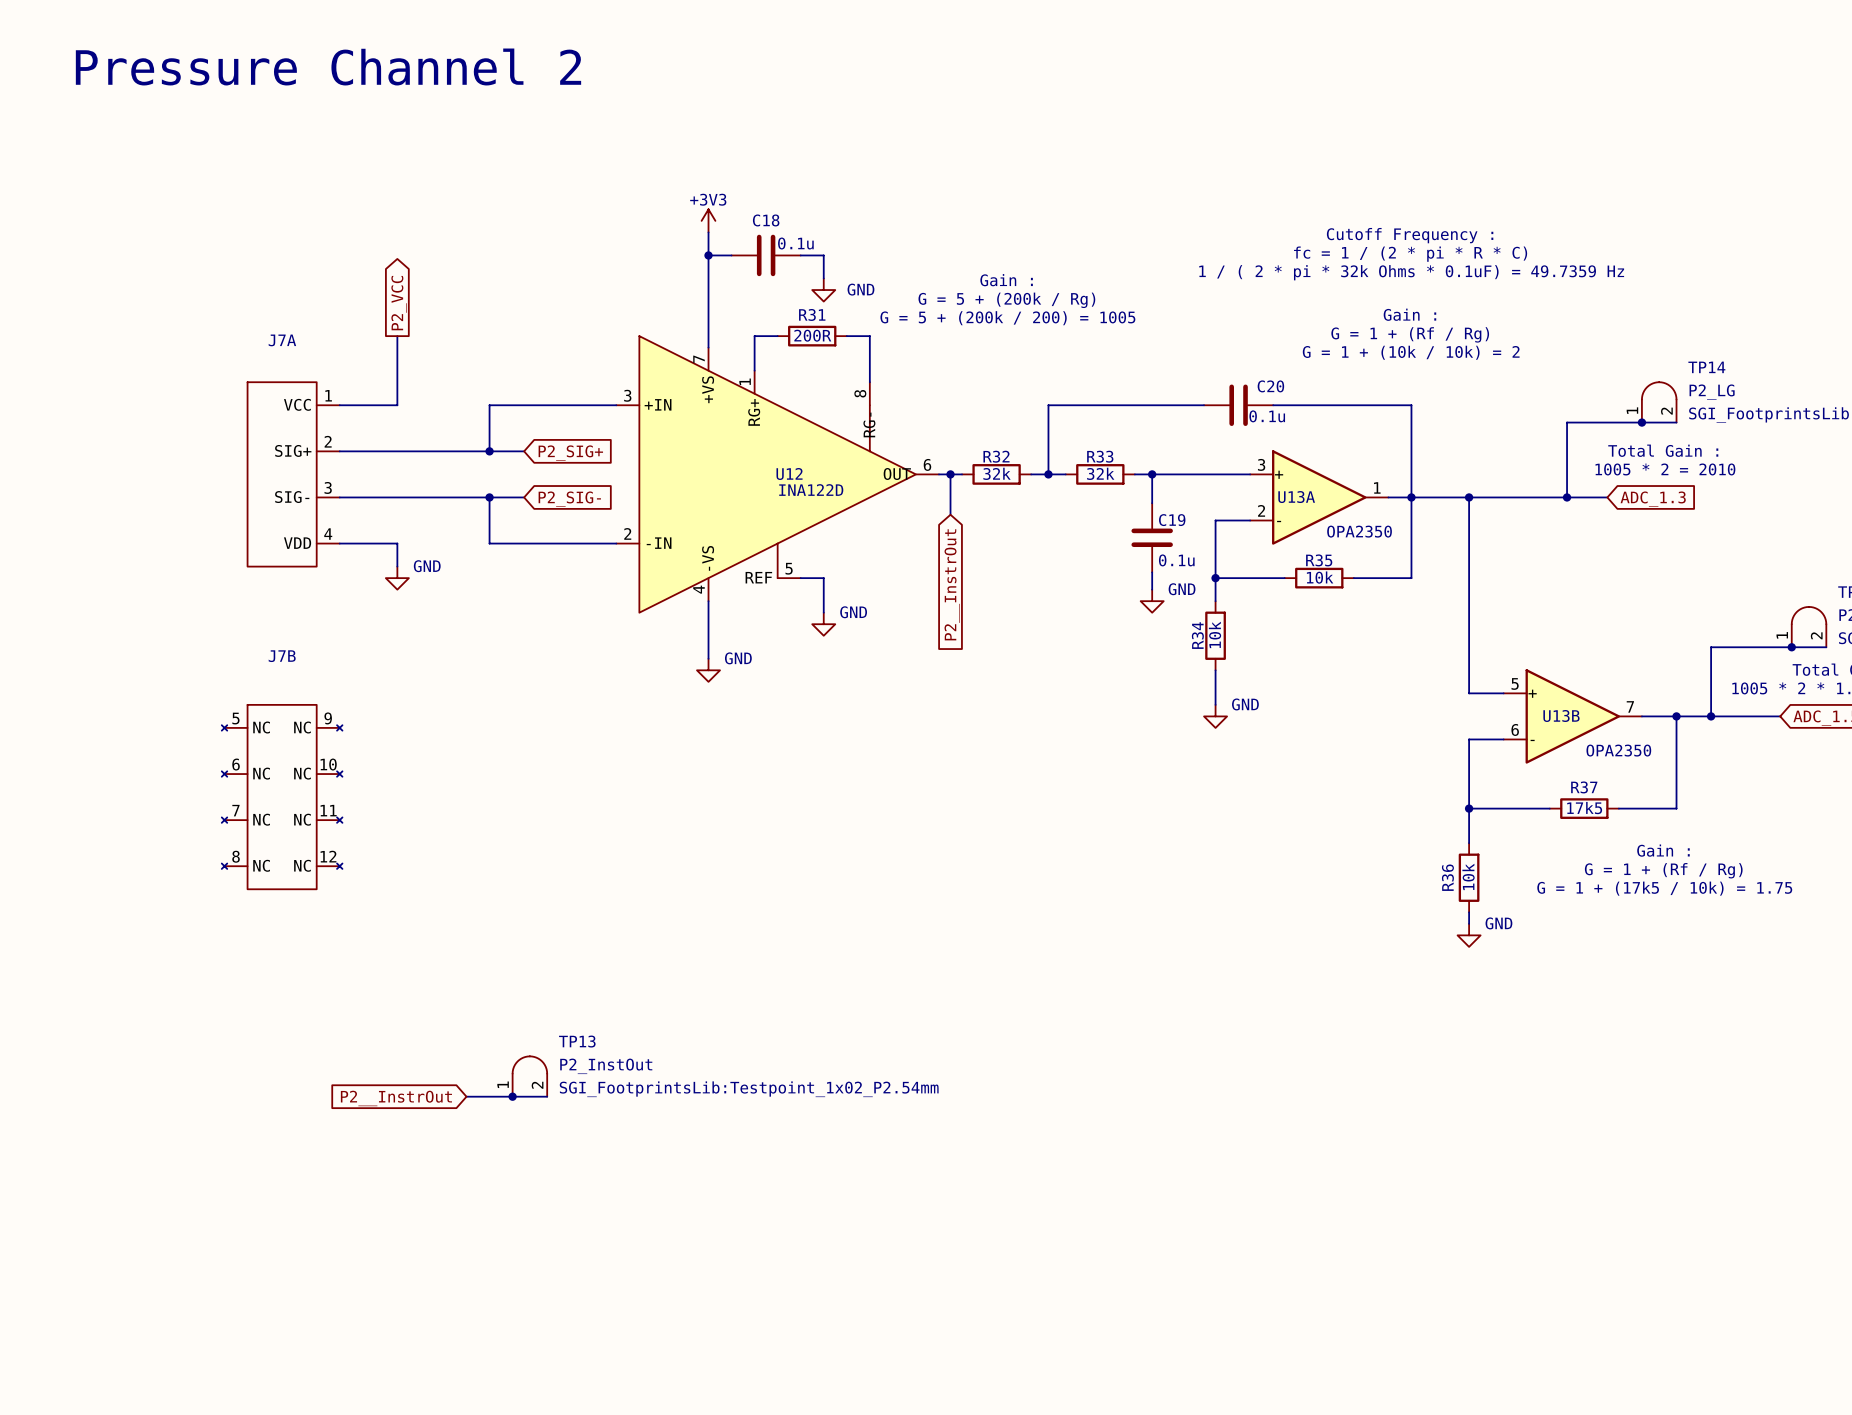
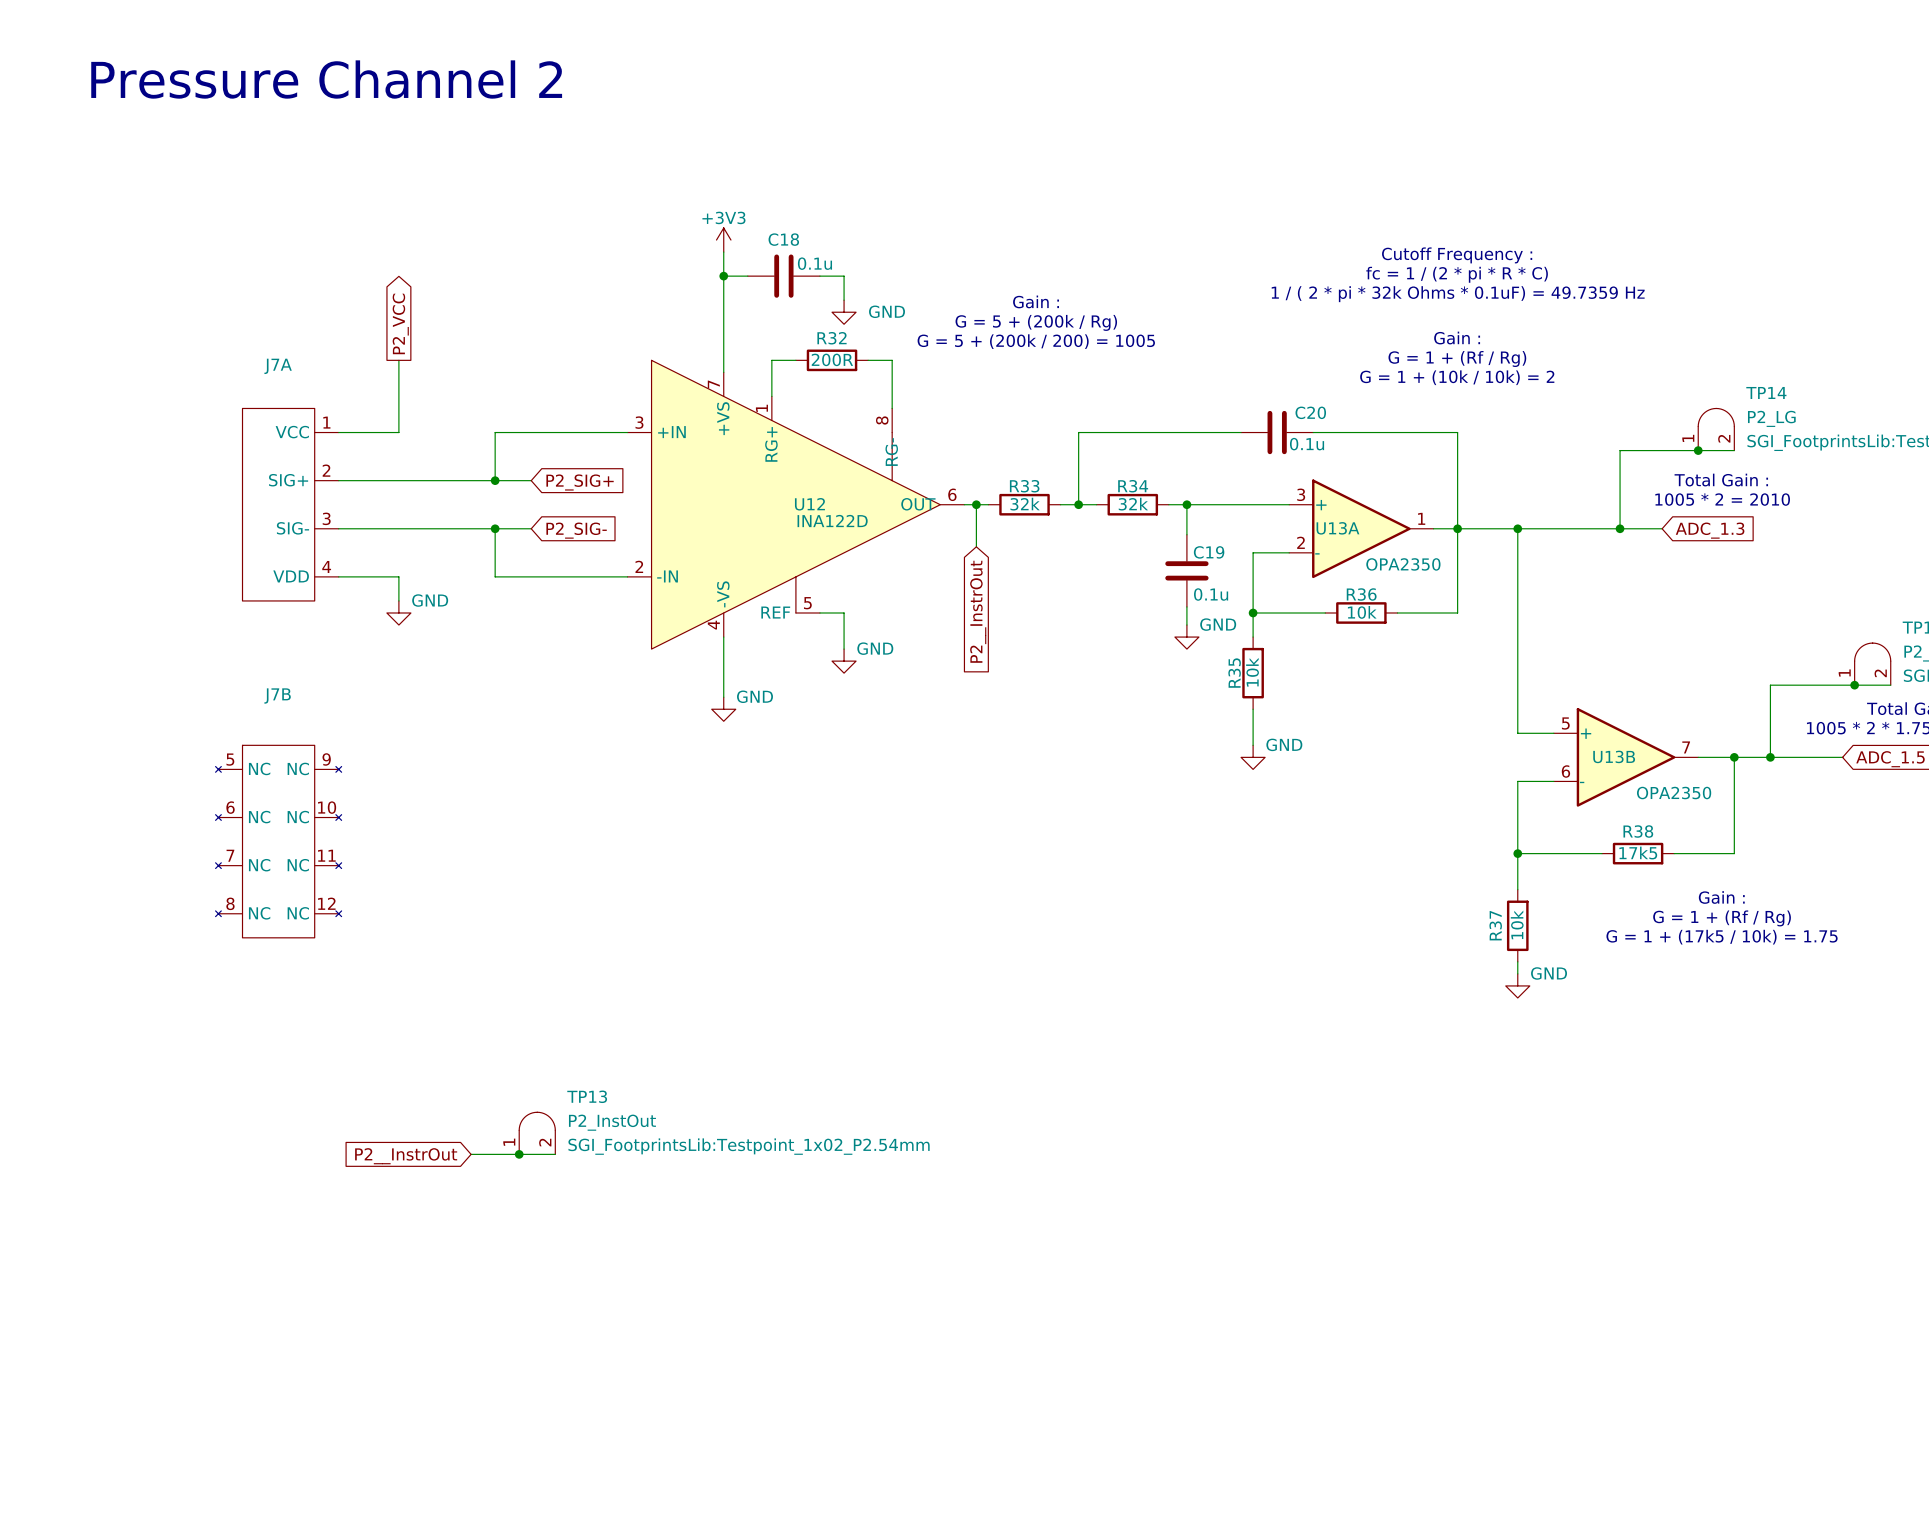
R31 name: R31 (812, 314) -> R32 (832, 338)
R32 name: R32 (996, 456) -> R33 (1024, 486)
R33 name: R33 (1100, 456) -> R34 (1133, 486)
R35 name: R35 (1319, 560) -> R36 (1361, 594)
R34 name: R34 (1197, 635) -> R35 (1234, 673)
R37 name: R37 (1584, 787) -> R38 (1638, 831)
R36 name: R36 (1447, 877) -> R37 (1495, 925)

